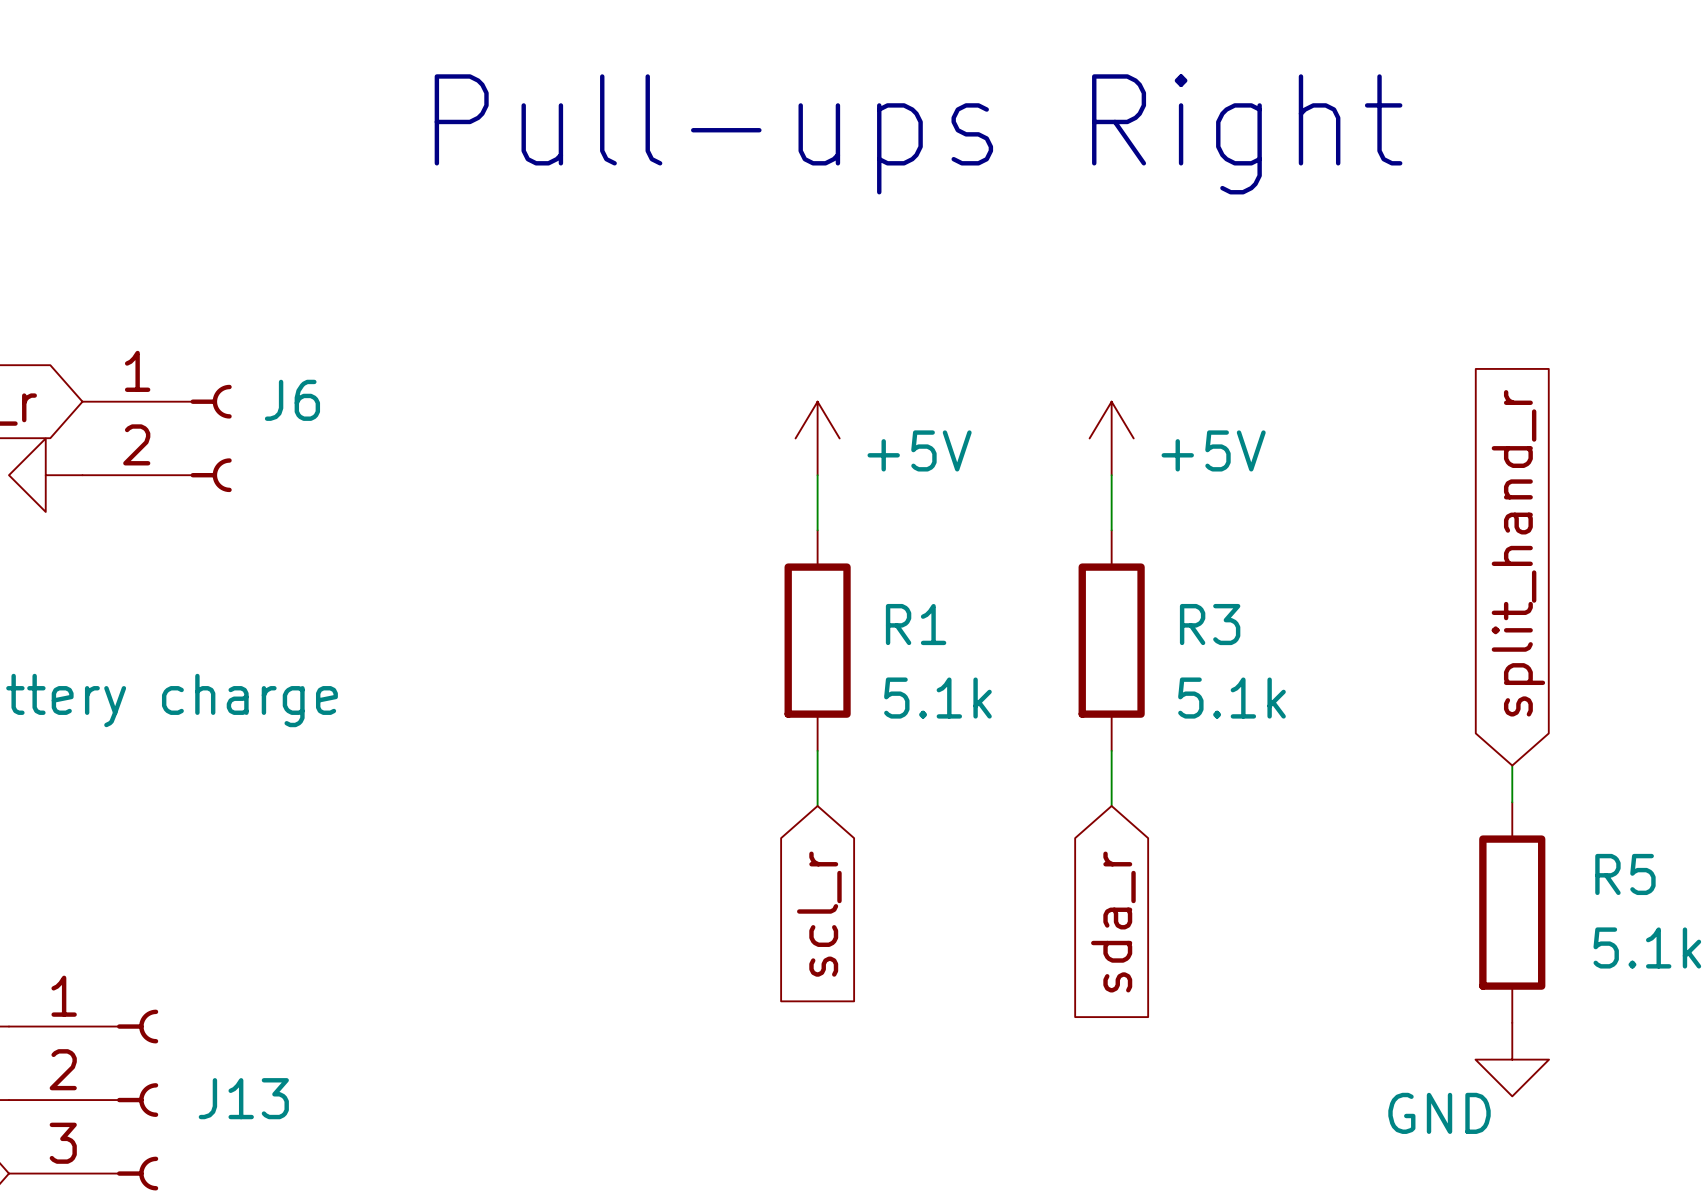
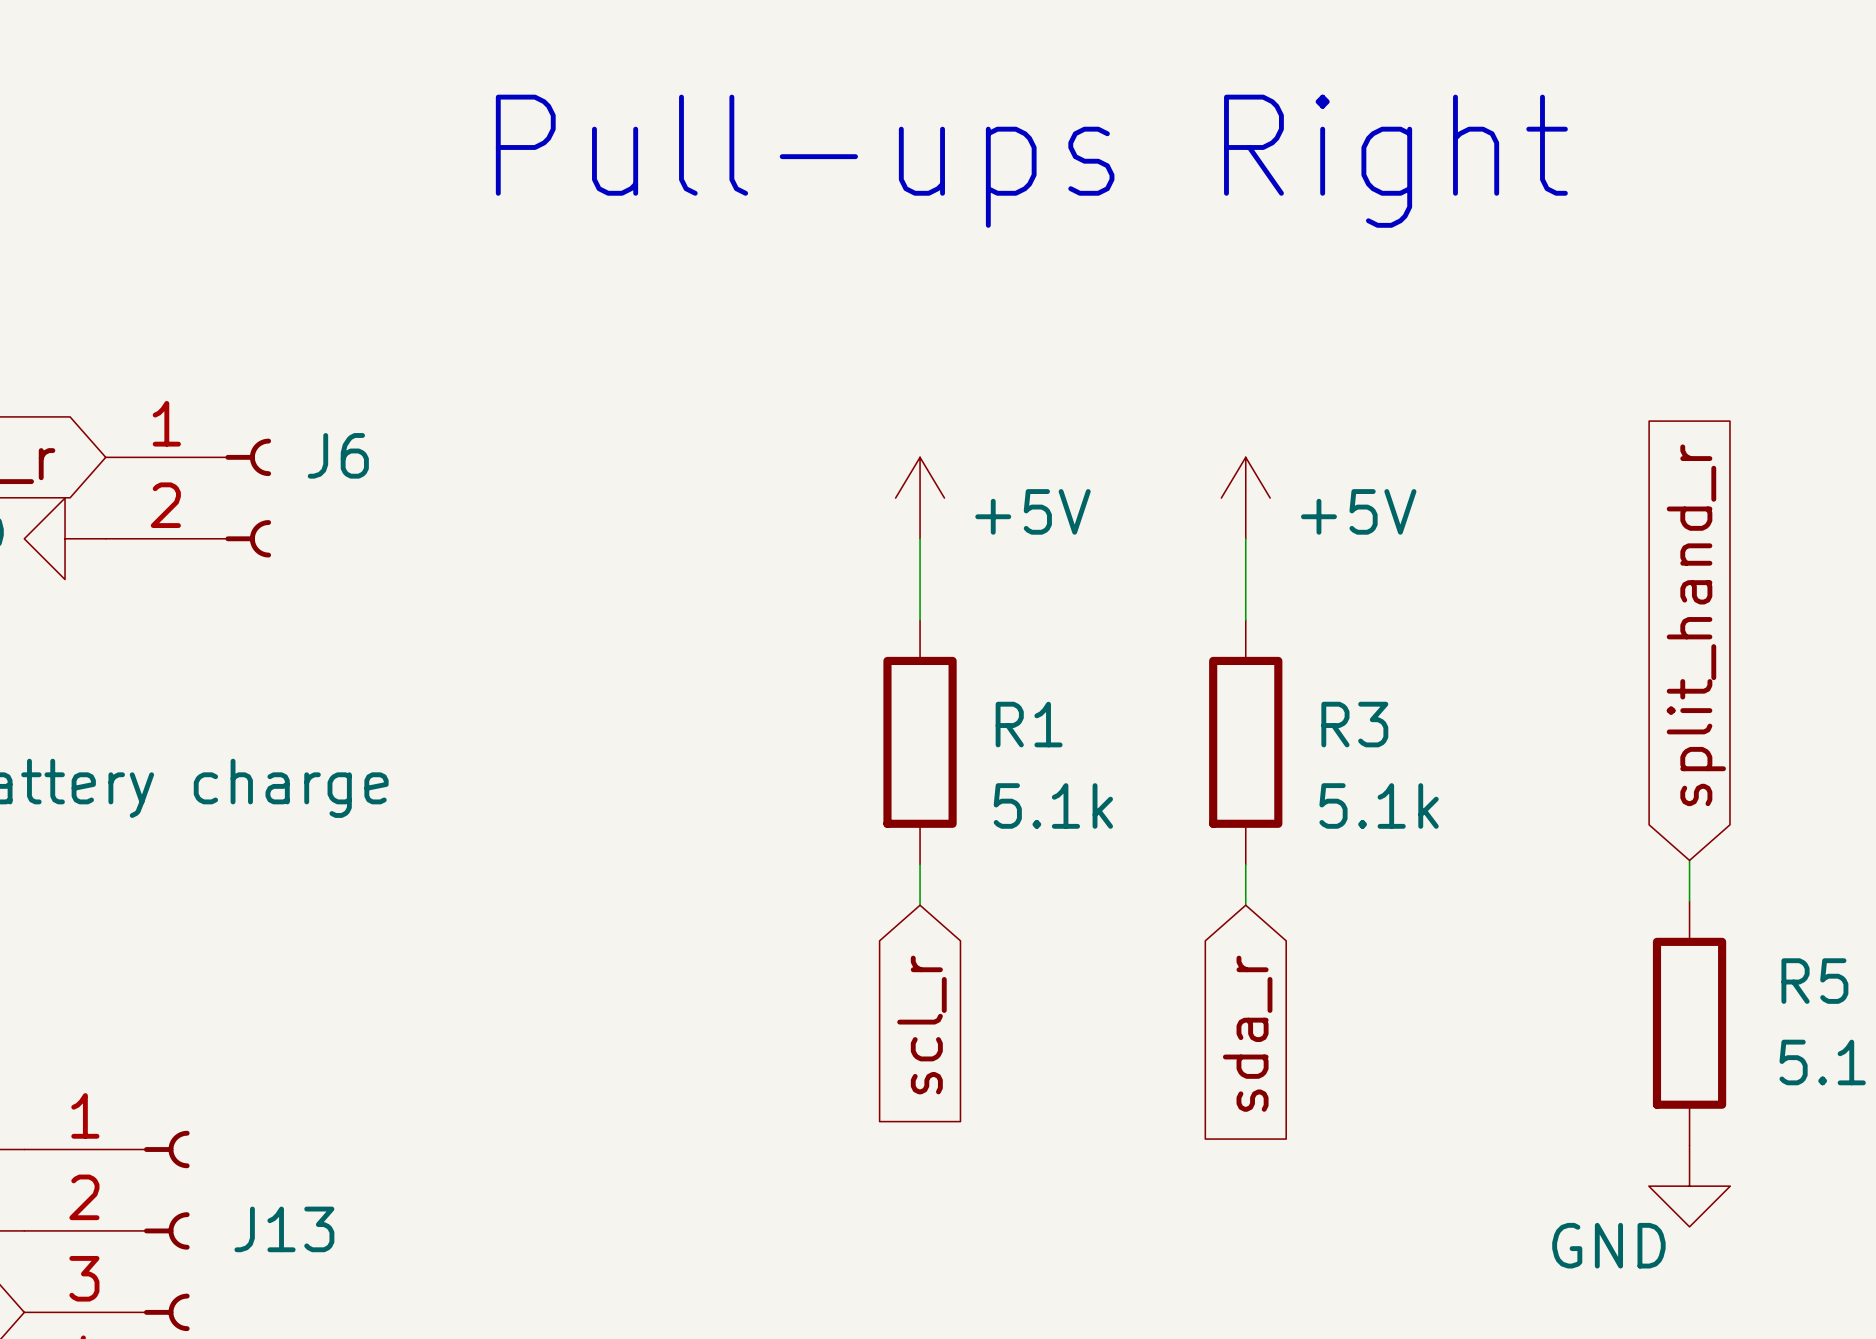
R1 position: (817, 640) -> (920, 742)
R3 position: (1111, 640) -> (1245, 742)

